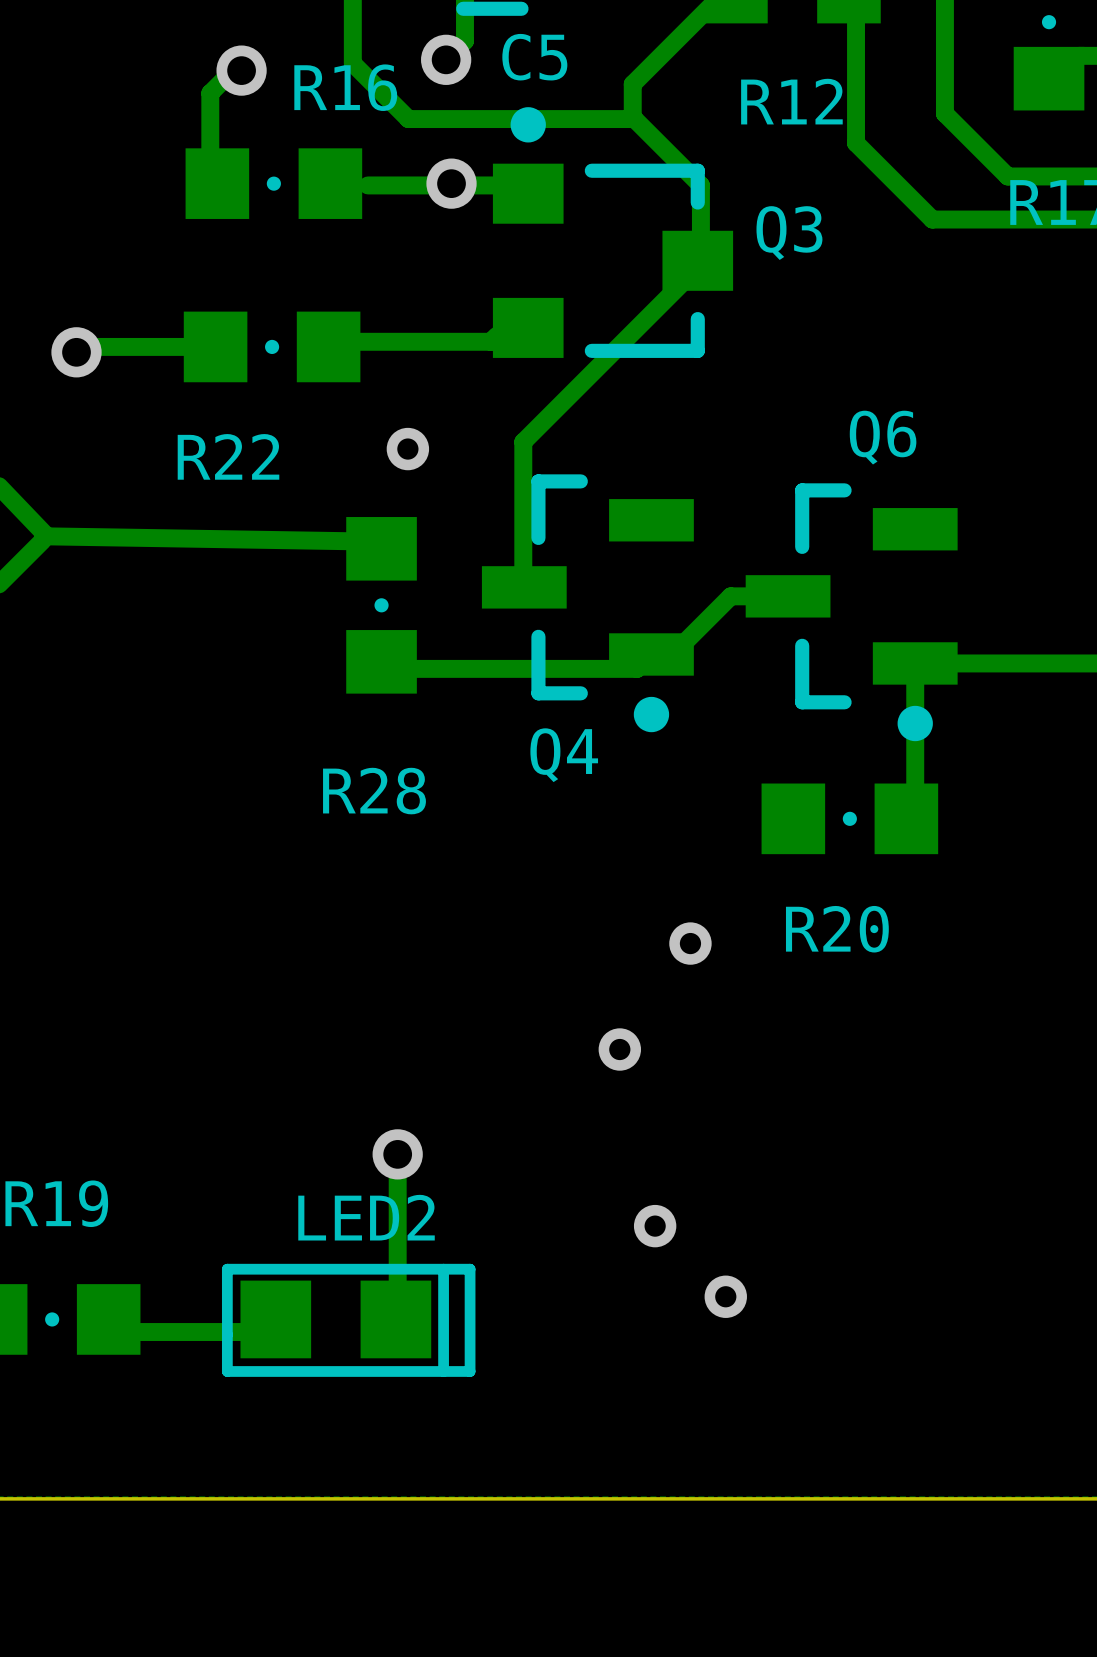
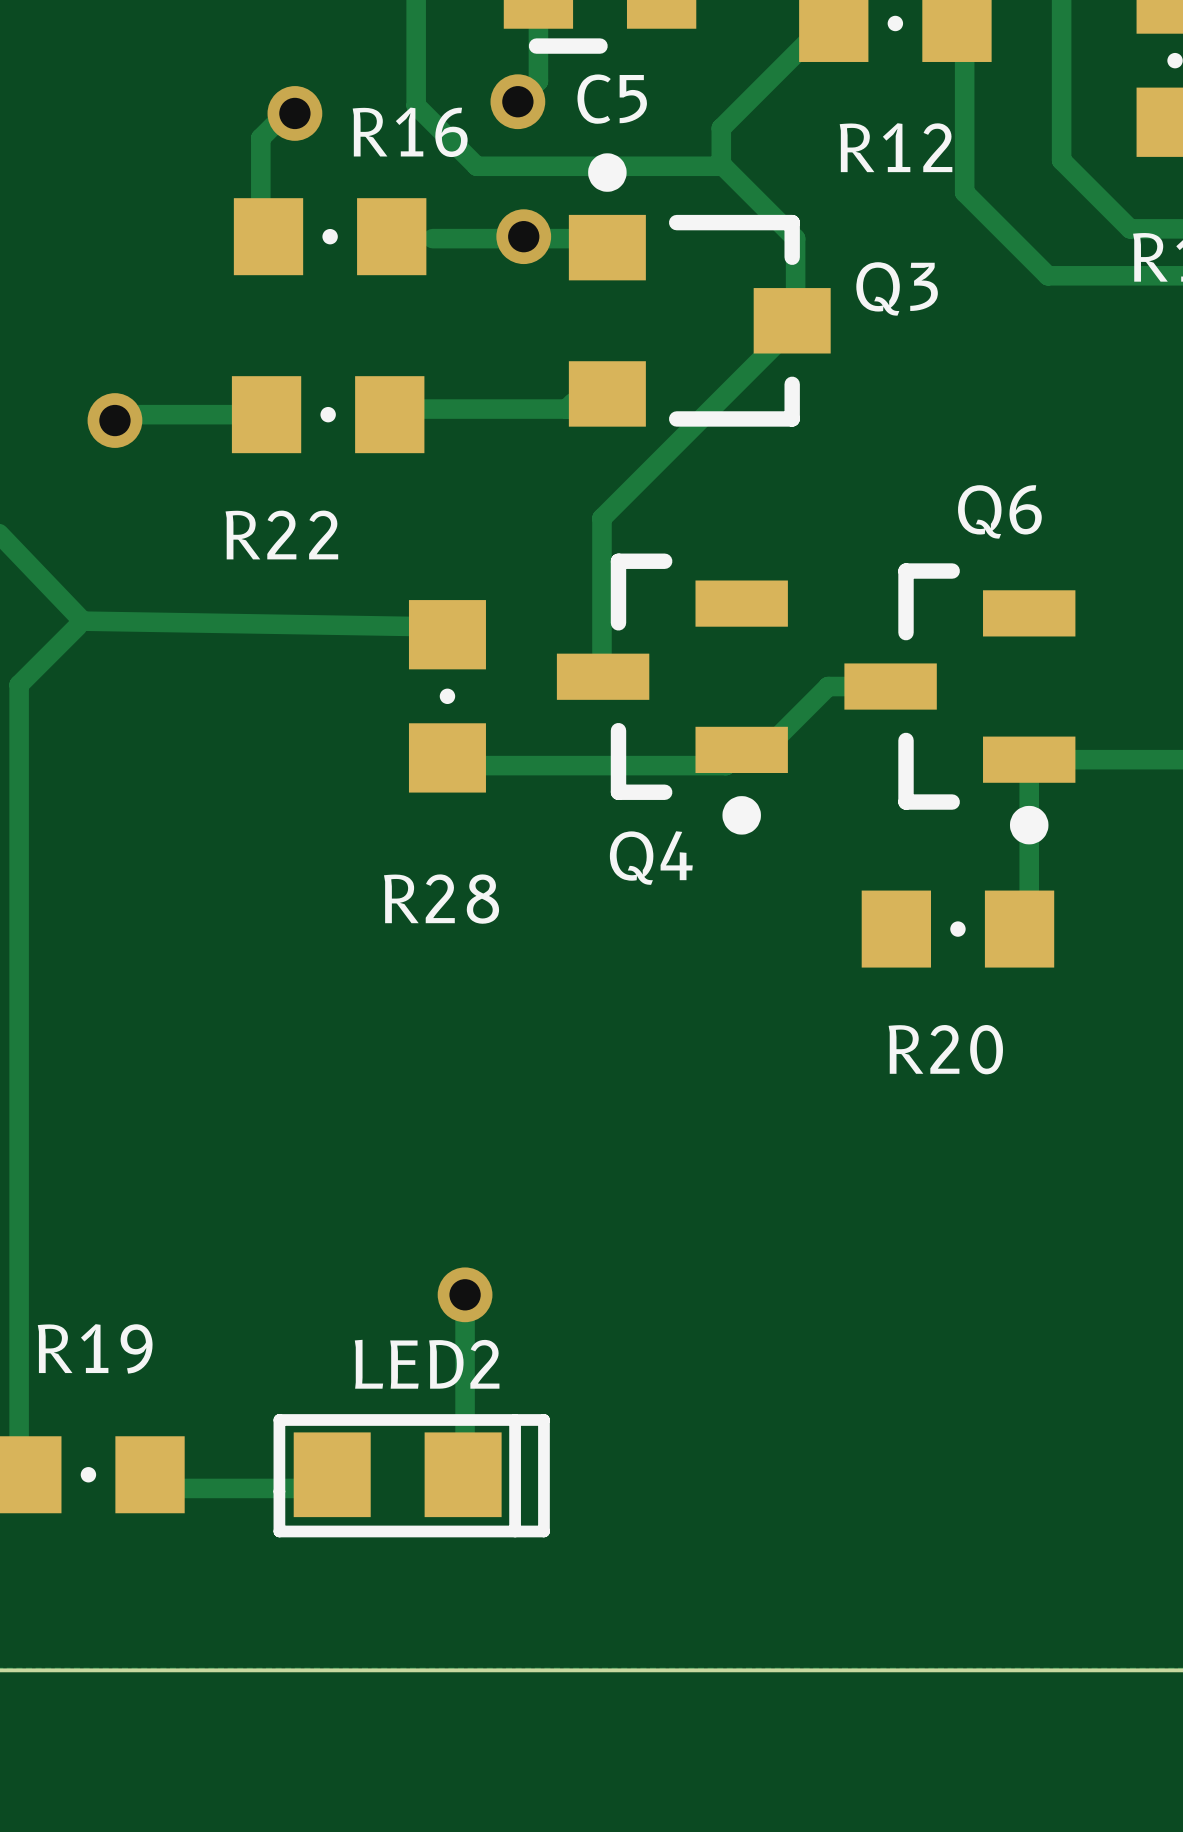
via: (407, 449) -> none
via: (690, 943) -> none
via: (619, 1049) -> none
via: (655, 1226) -> none
via: (725, 1296) -> none

